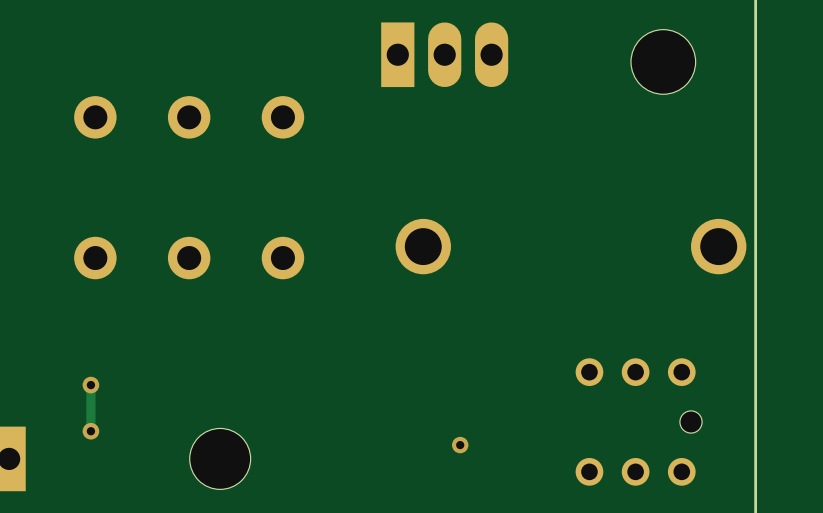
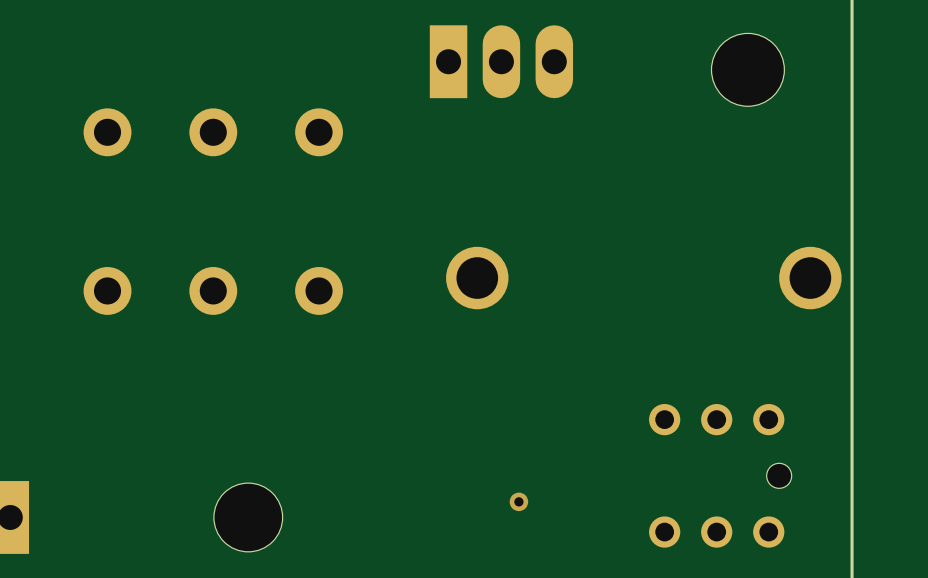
track: (90, 385) (90, 431) -> none
via: (90, 385) -> none
via: (90, 431) -> none

